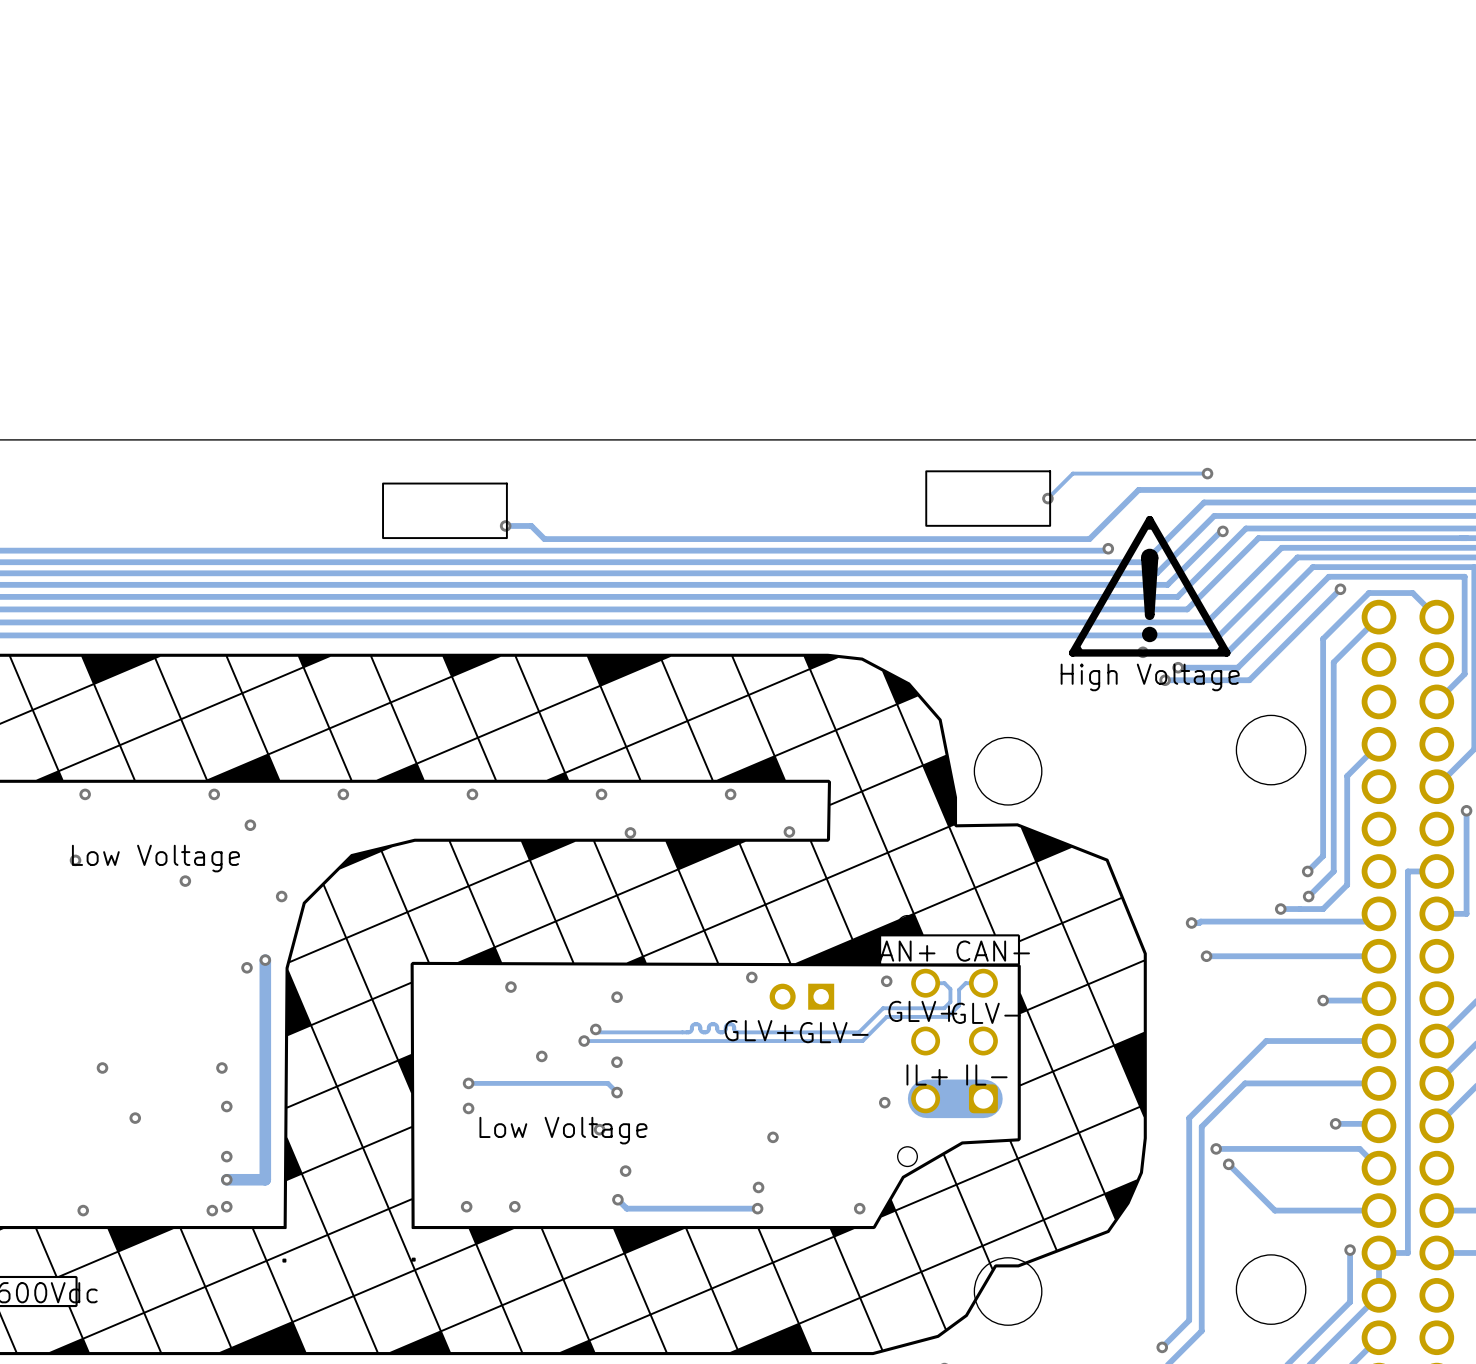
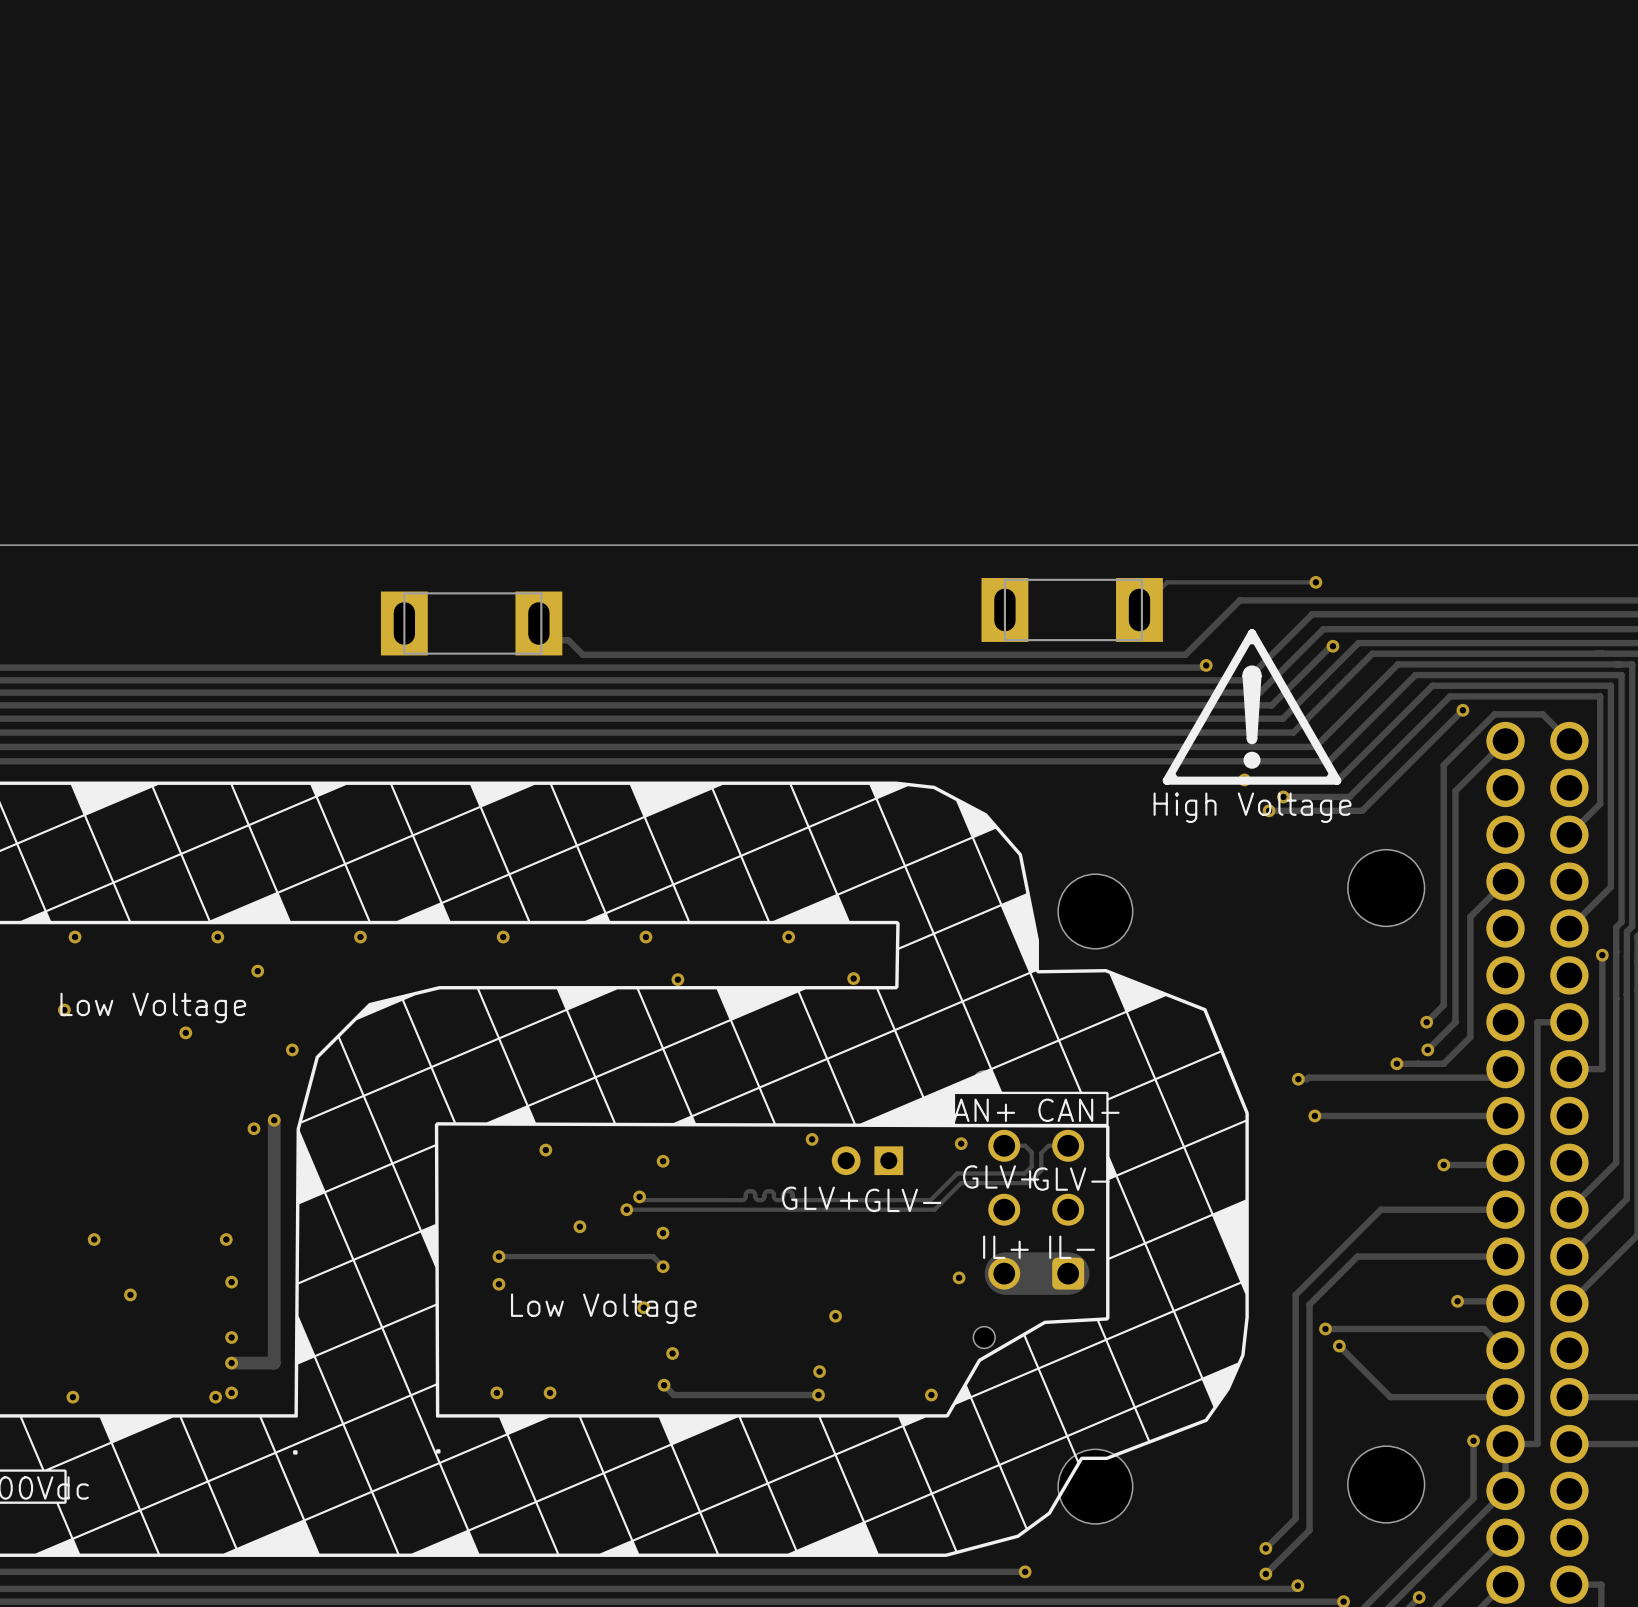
part footprint: [925, 470, 1052, 527] -> [981, 578, 1163, 642]
part footprint: [382, 482, 508, 540] -> [380, 591, 563, 656]
via: (1047, 498) -> none
via: (505, 525) -> none

